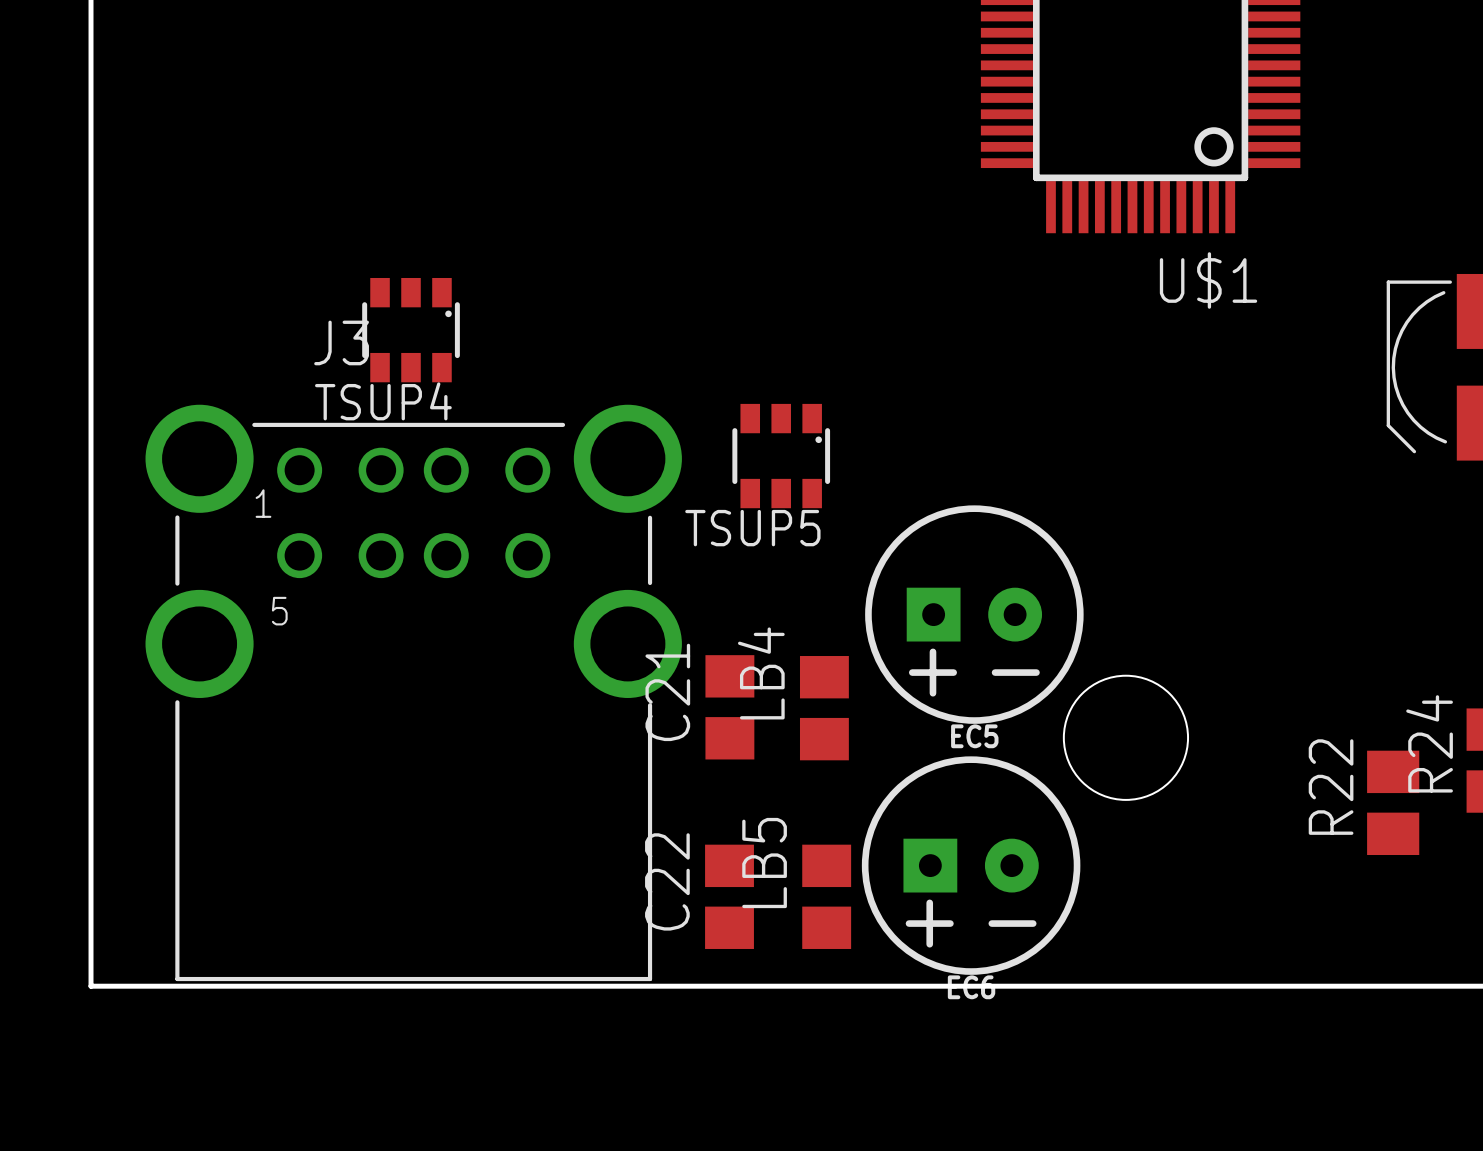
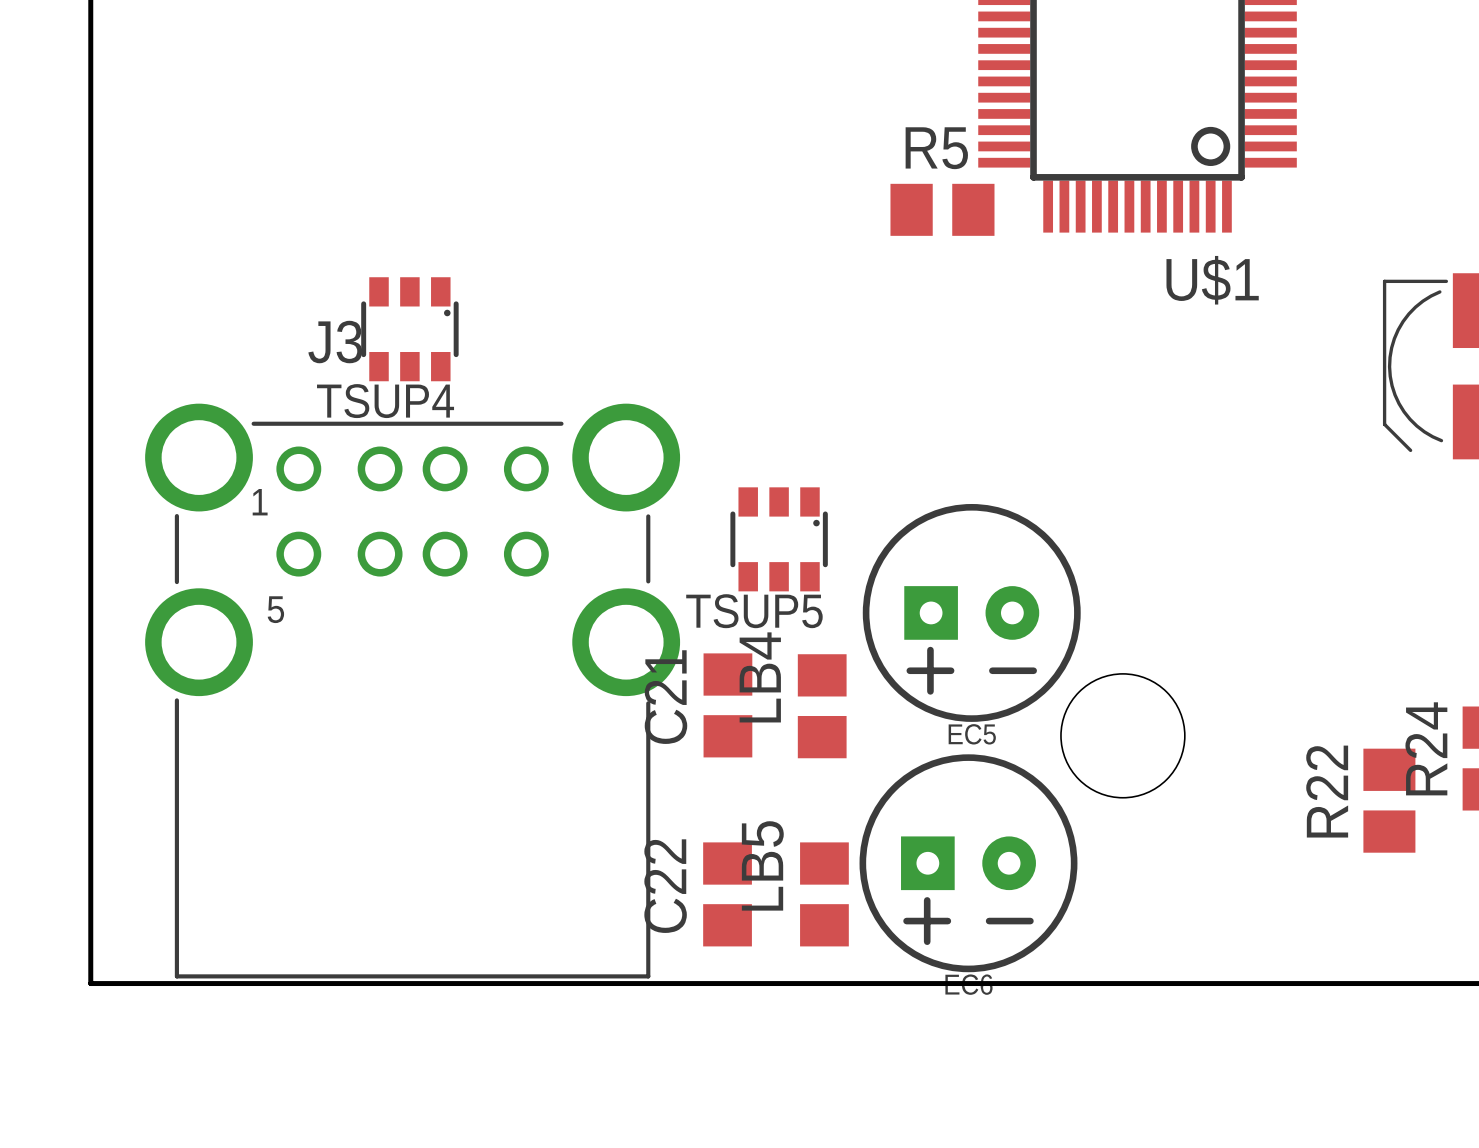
R5: none -> (942, 209)
TSUP5 position: (781, 456) -> (779, 539)

